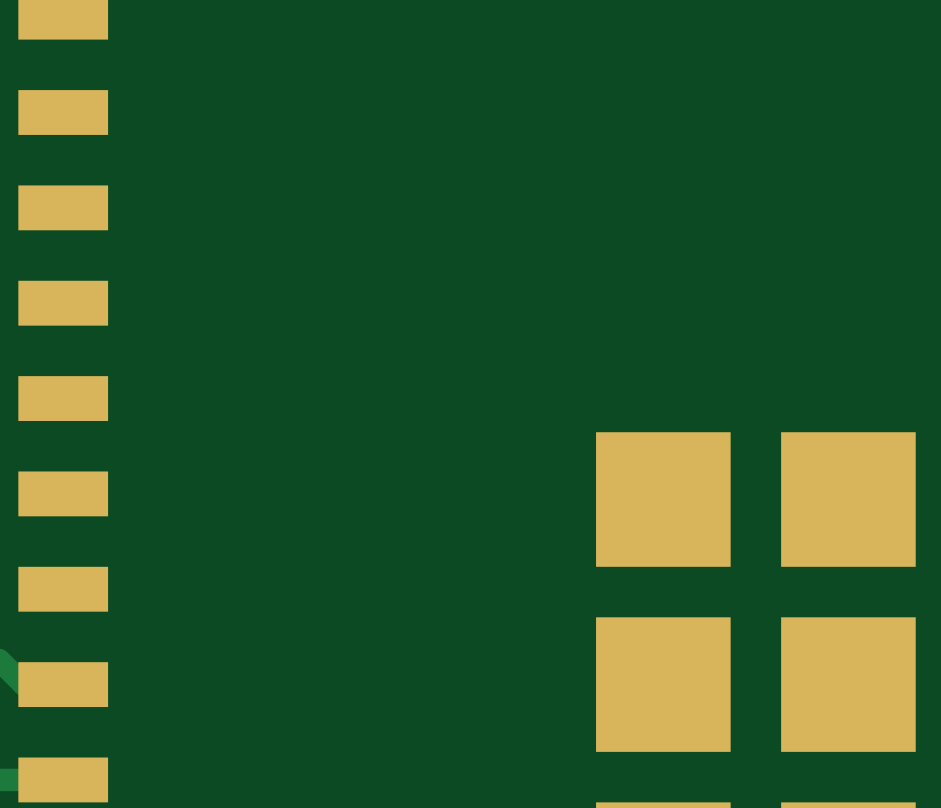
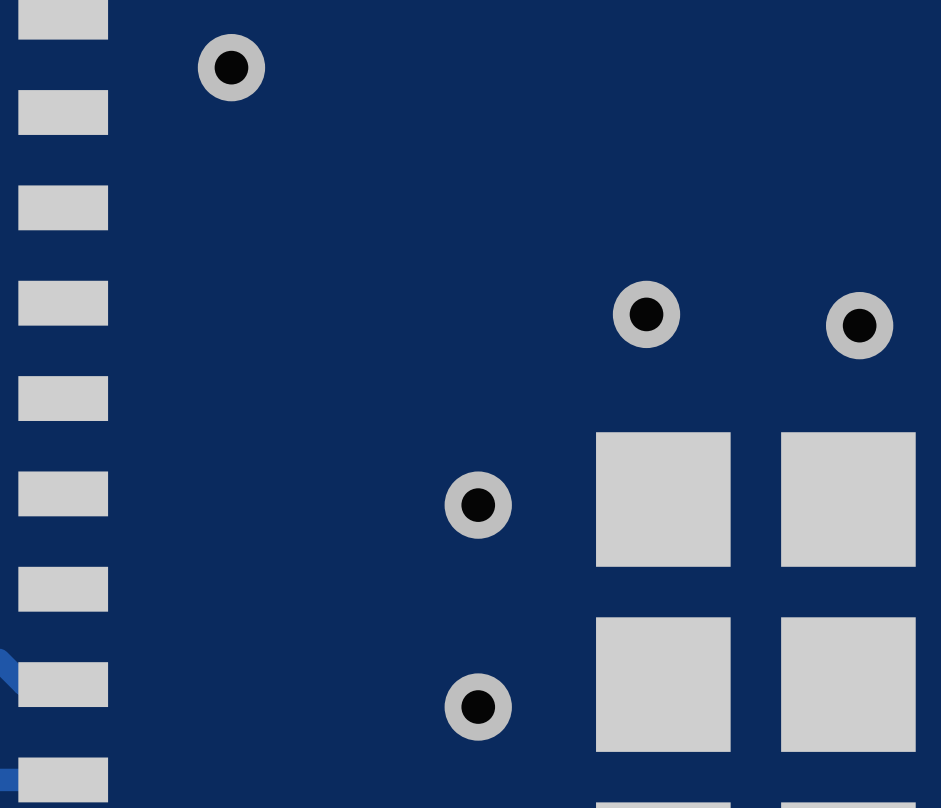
via: none -> (231, 67)
via: none -> (646, 314)
via: none -> (859, 325)
via: none -> (478, 505)
via: none -> (478, 707)

